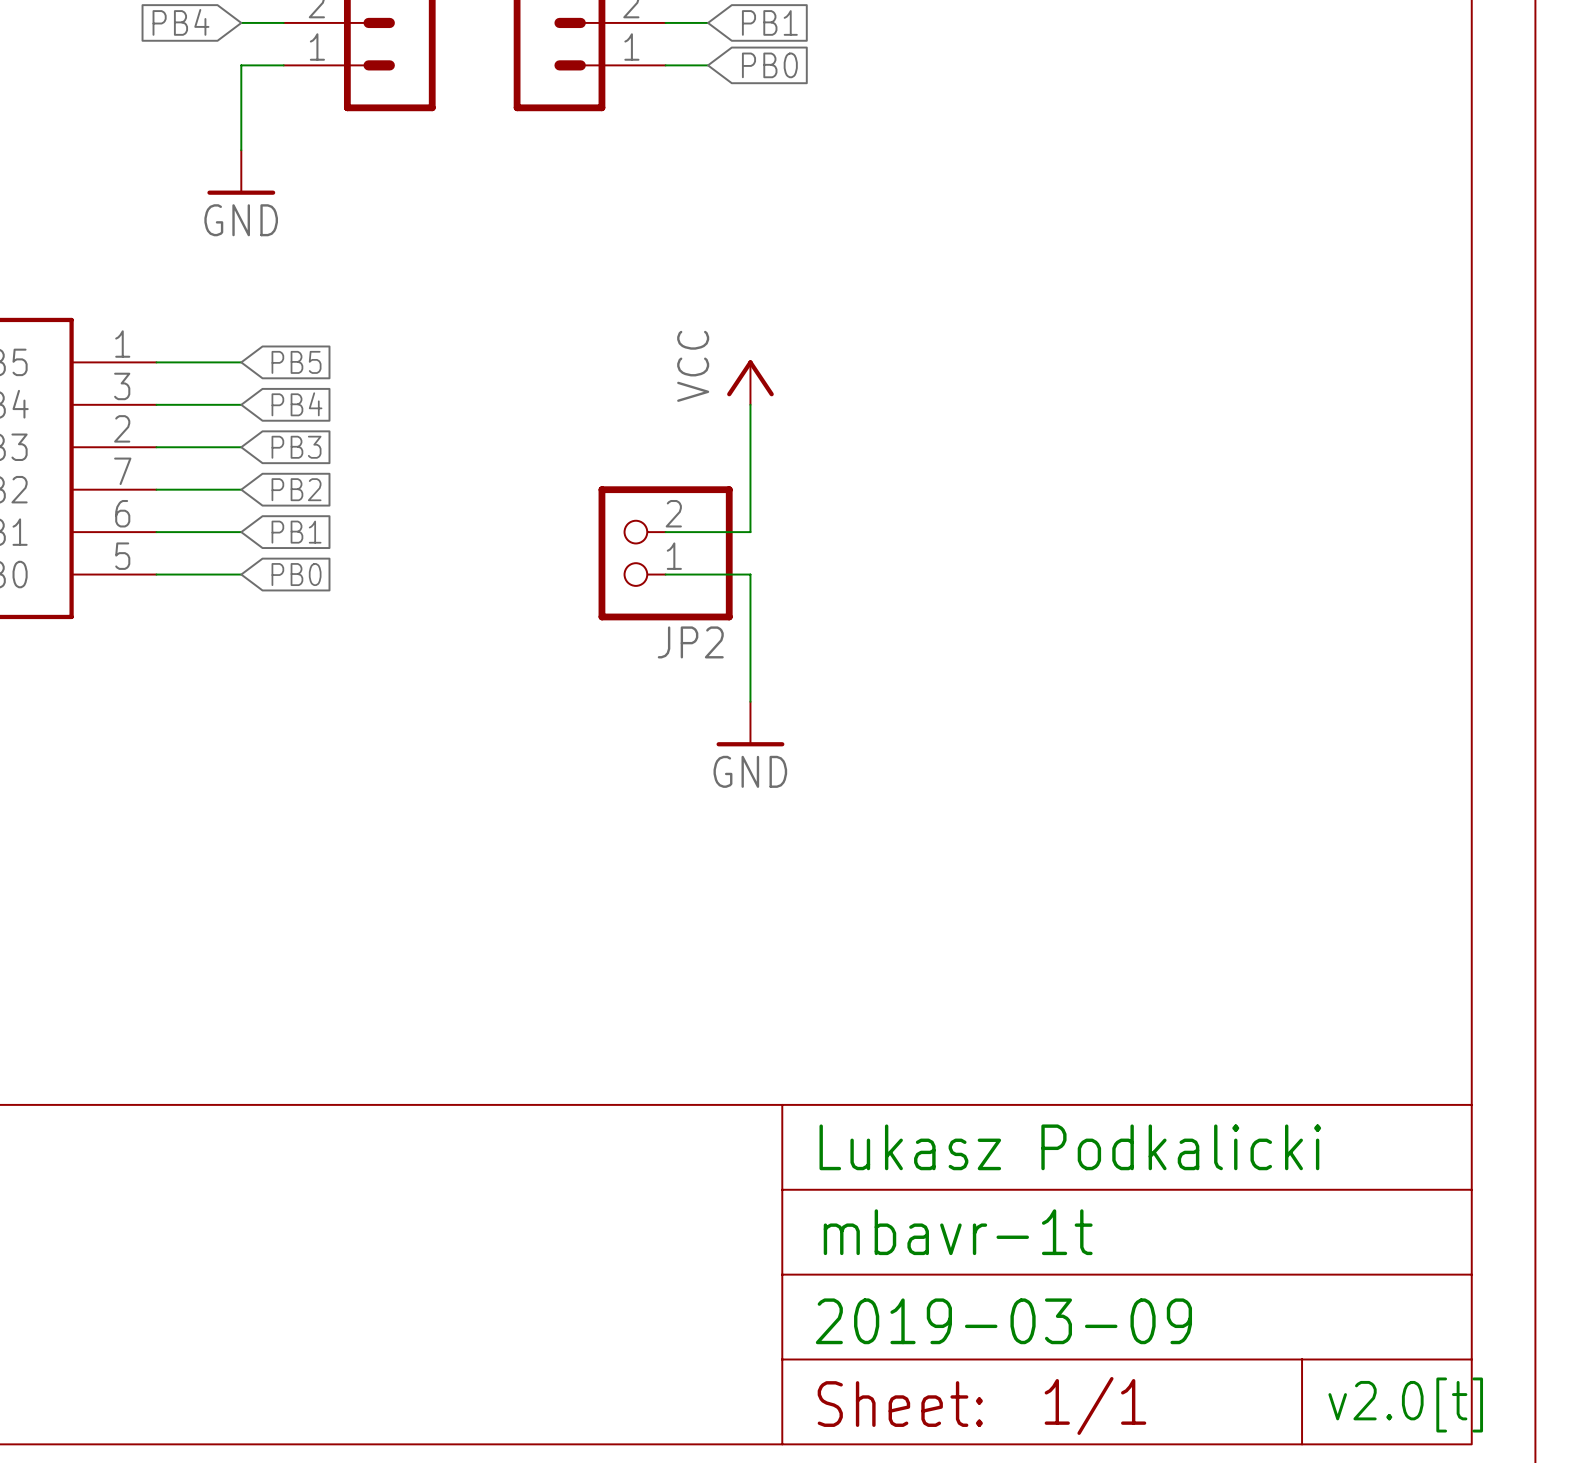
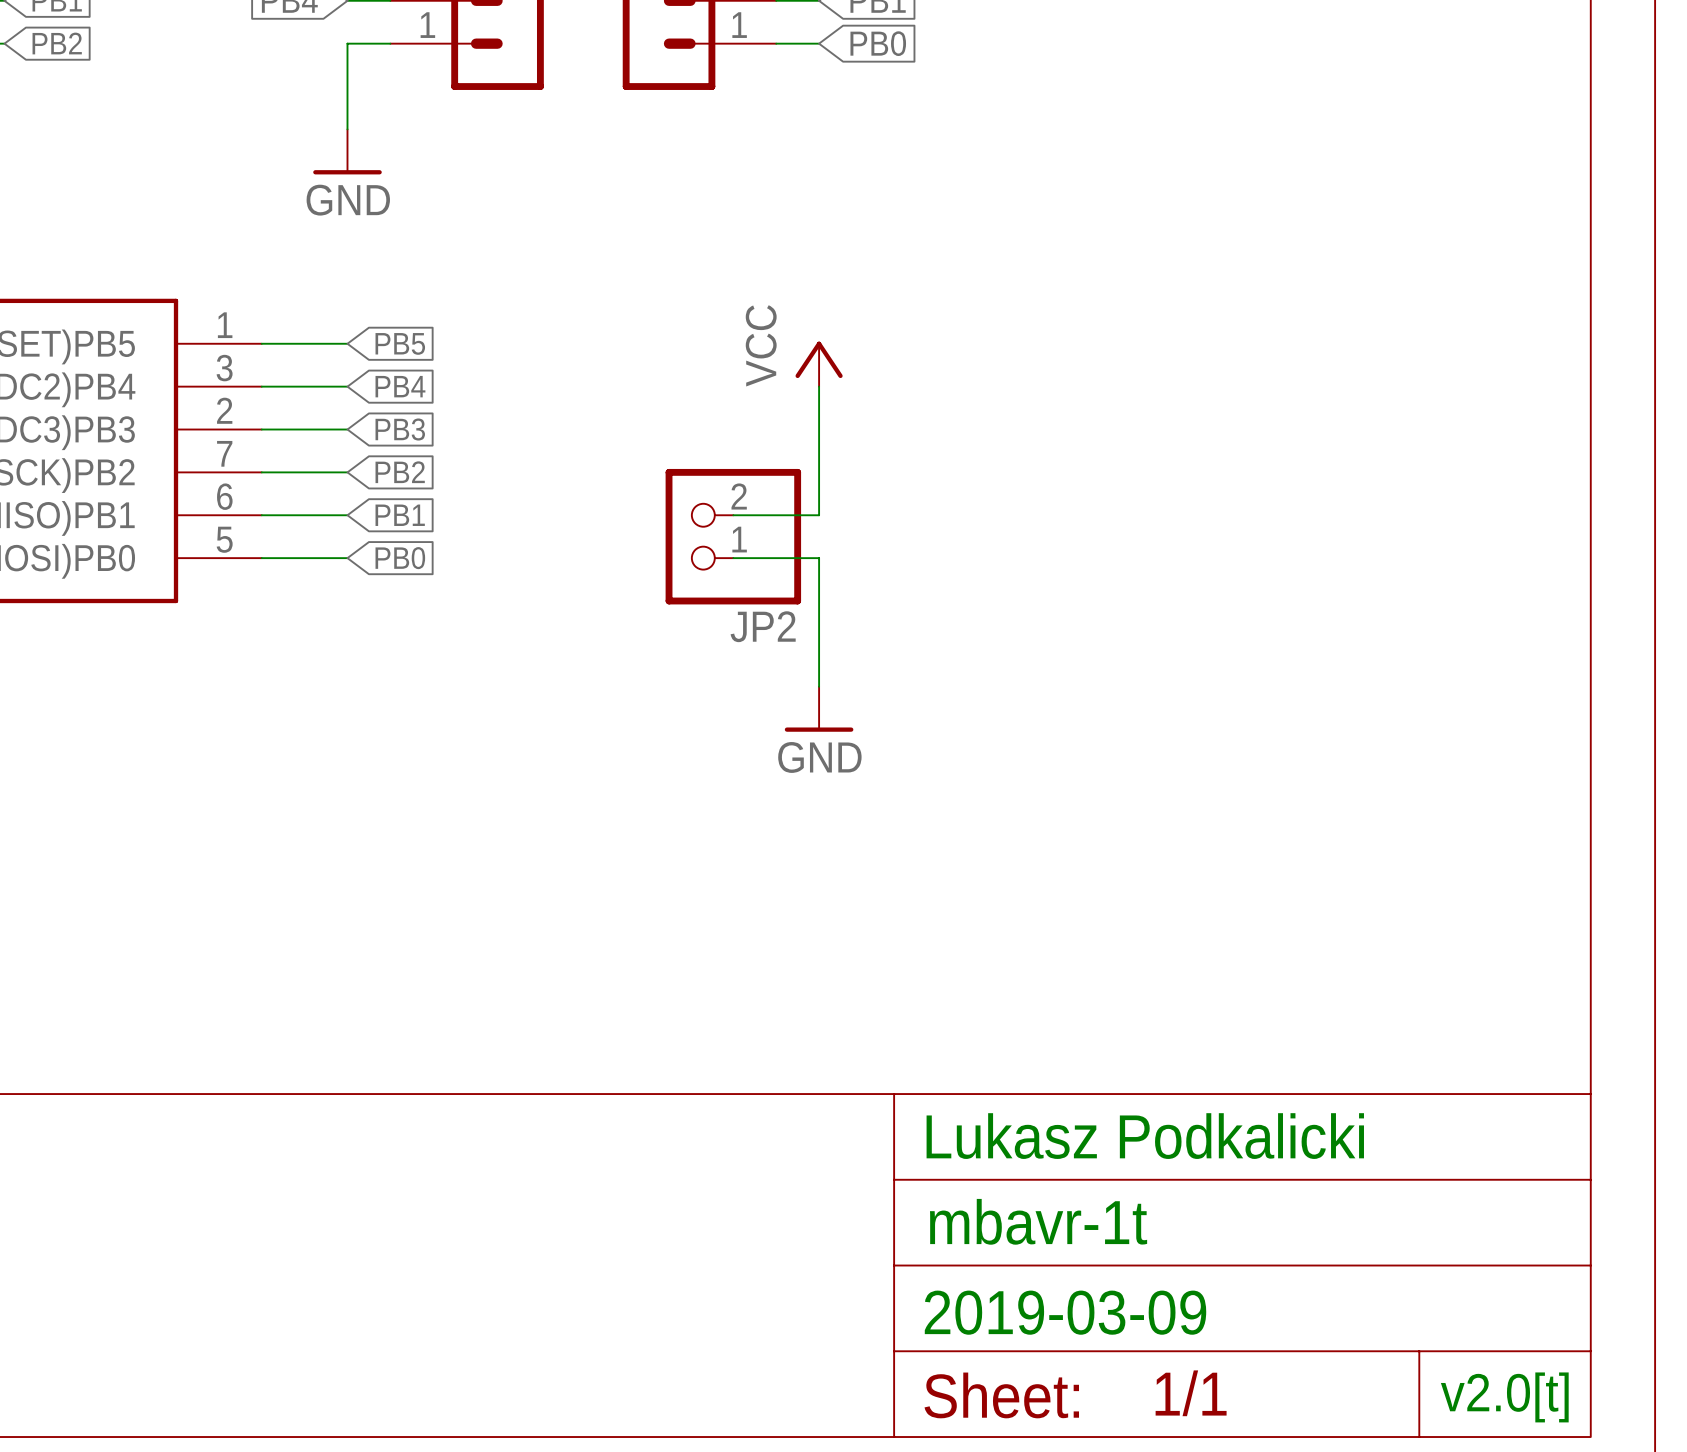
power symbol position: VCC (750, 382) -> VCC (819, 364)
wire: (750, 404) (750, 532) (708, 532) -> (819, 386) (819, 515)
wire: none -> (733, 515) (776, 515)
JP2 position: (665, 553) -> (733, 536)
wire: none -> (733, 558) (776, 558)
wire: (708, 574) (750, 574) (750, 701) -> (819, 558) (819, 686)
power symbol position: GND (750, 724) -> GND (819, 709)

